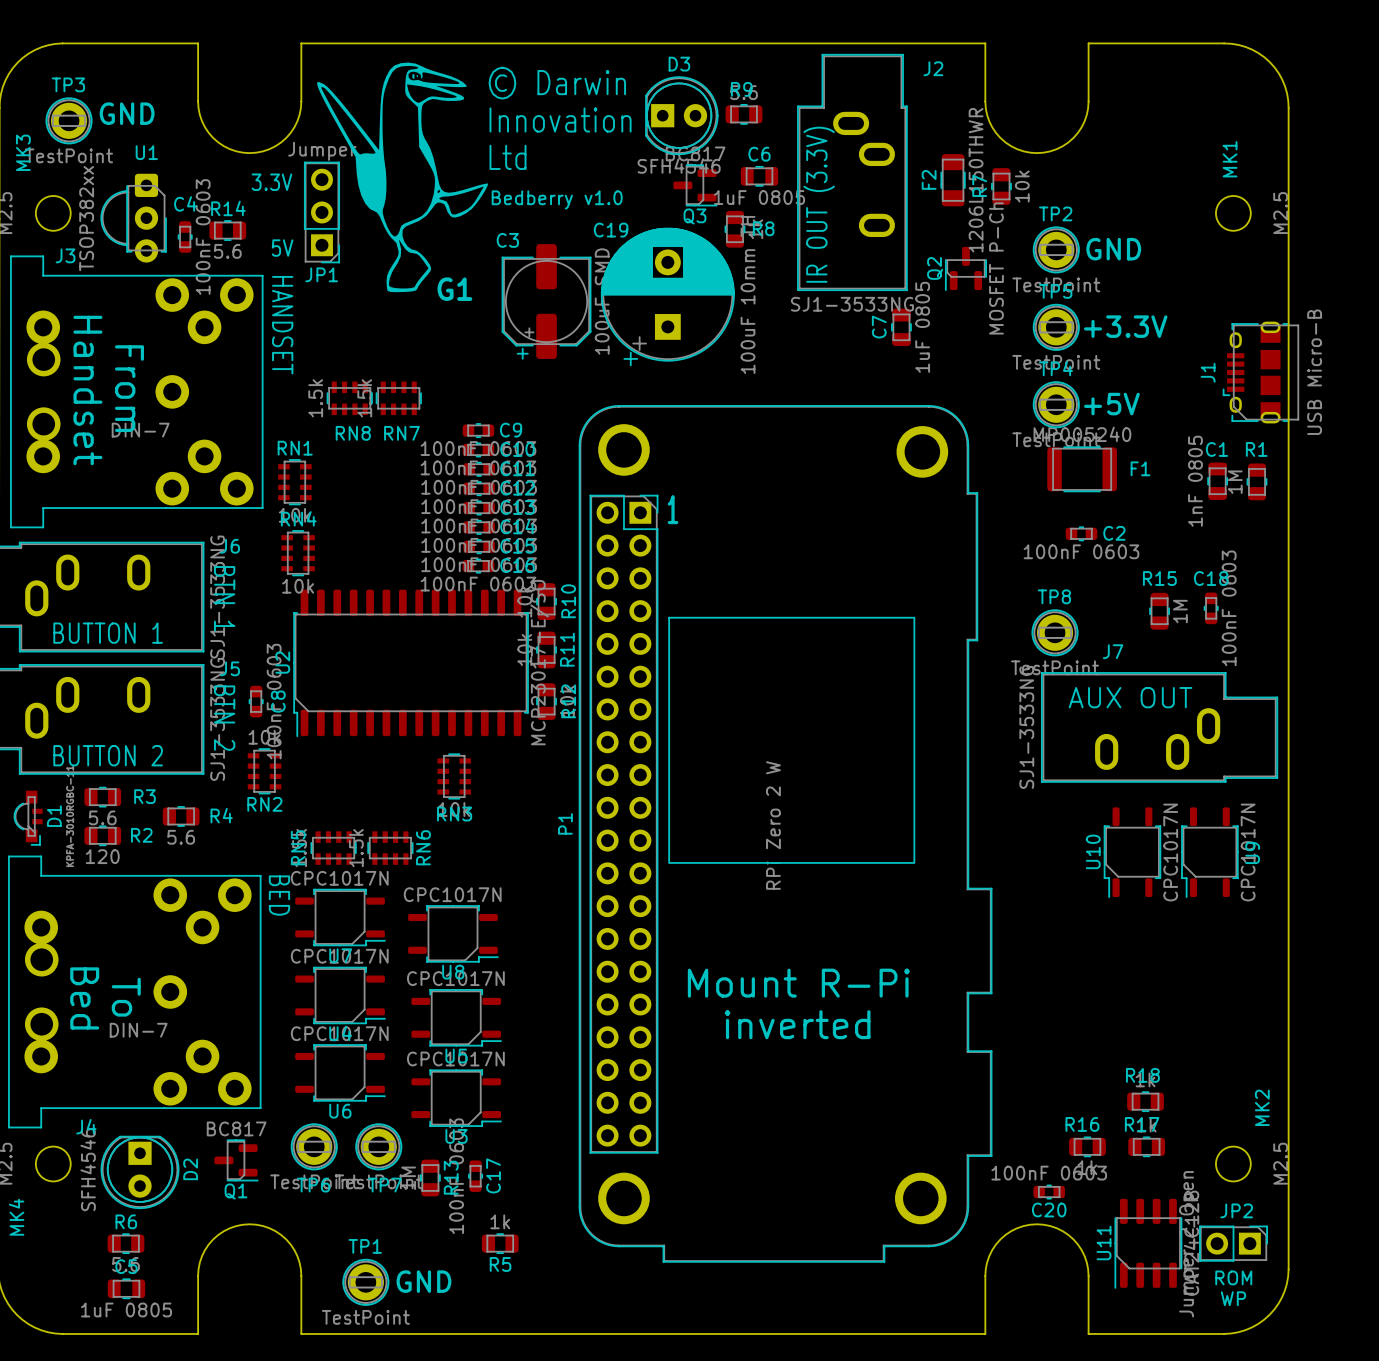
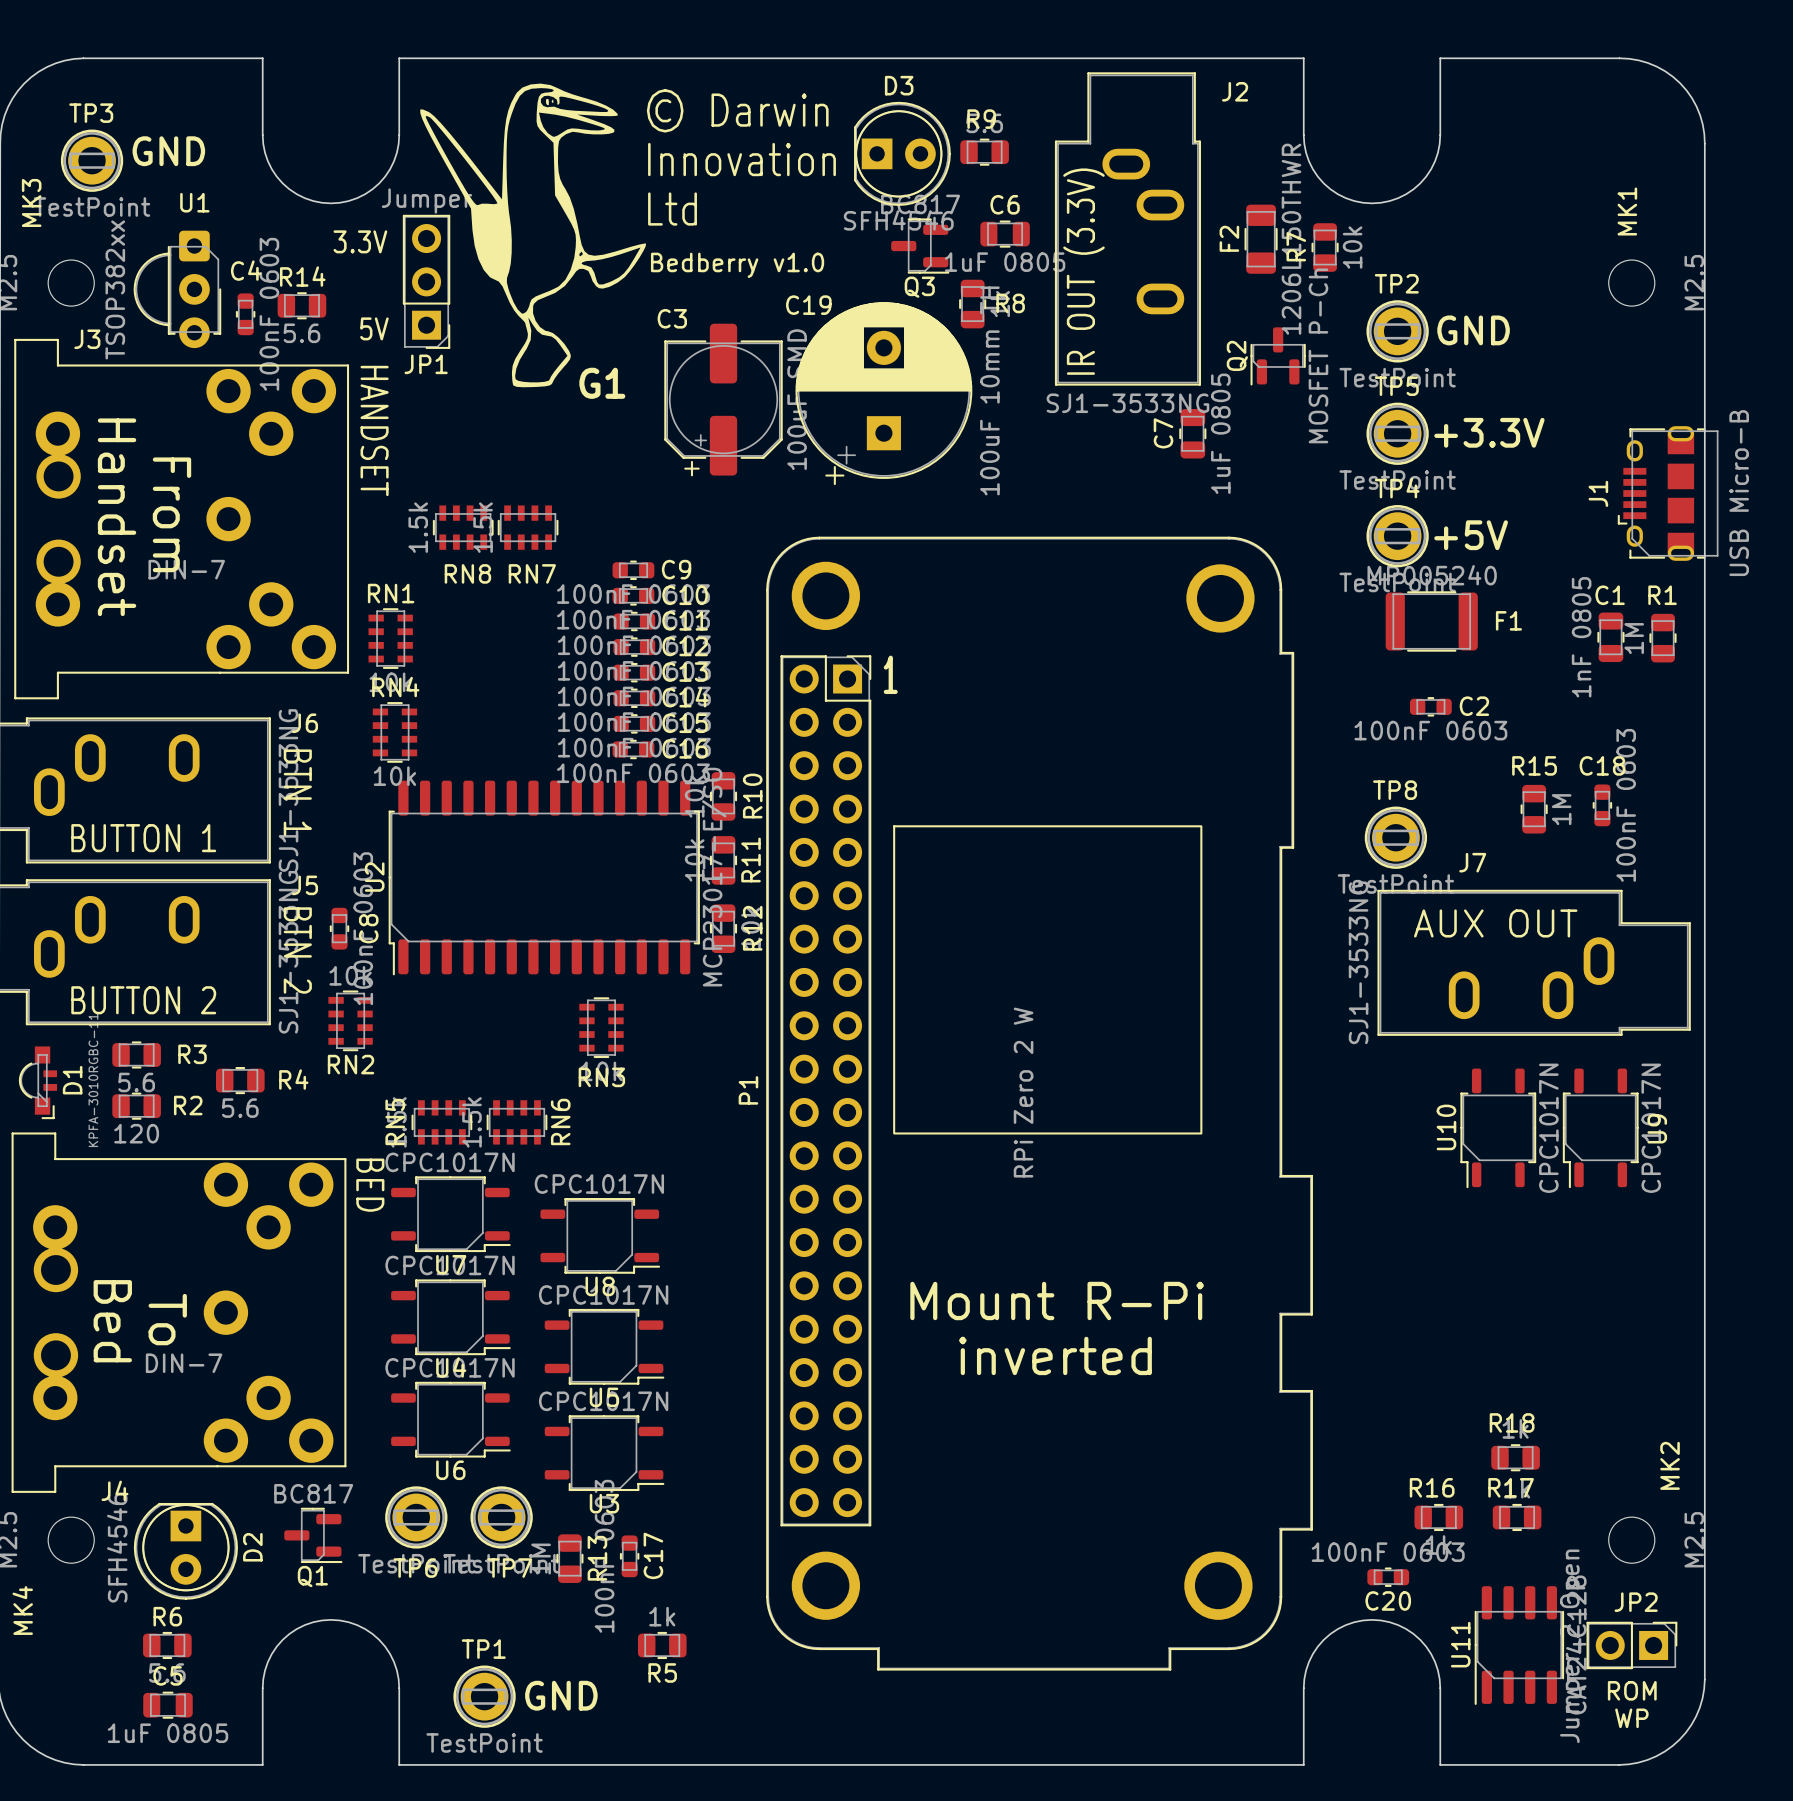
P1 footprint: [578, 405, 993, 1263] -> [766, 536, 1313, 1671]

